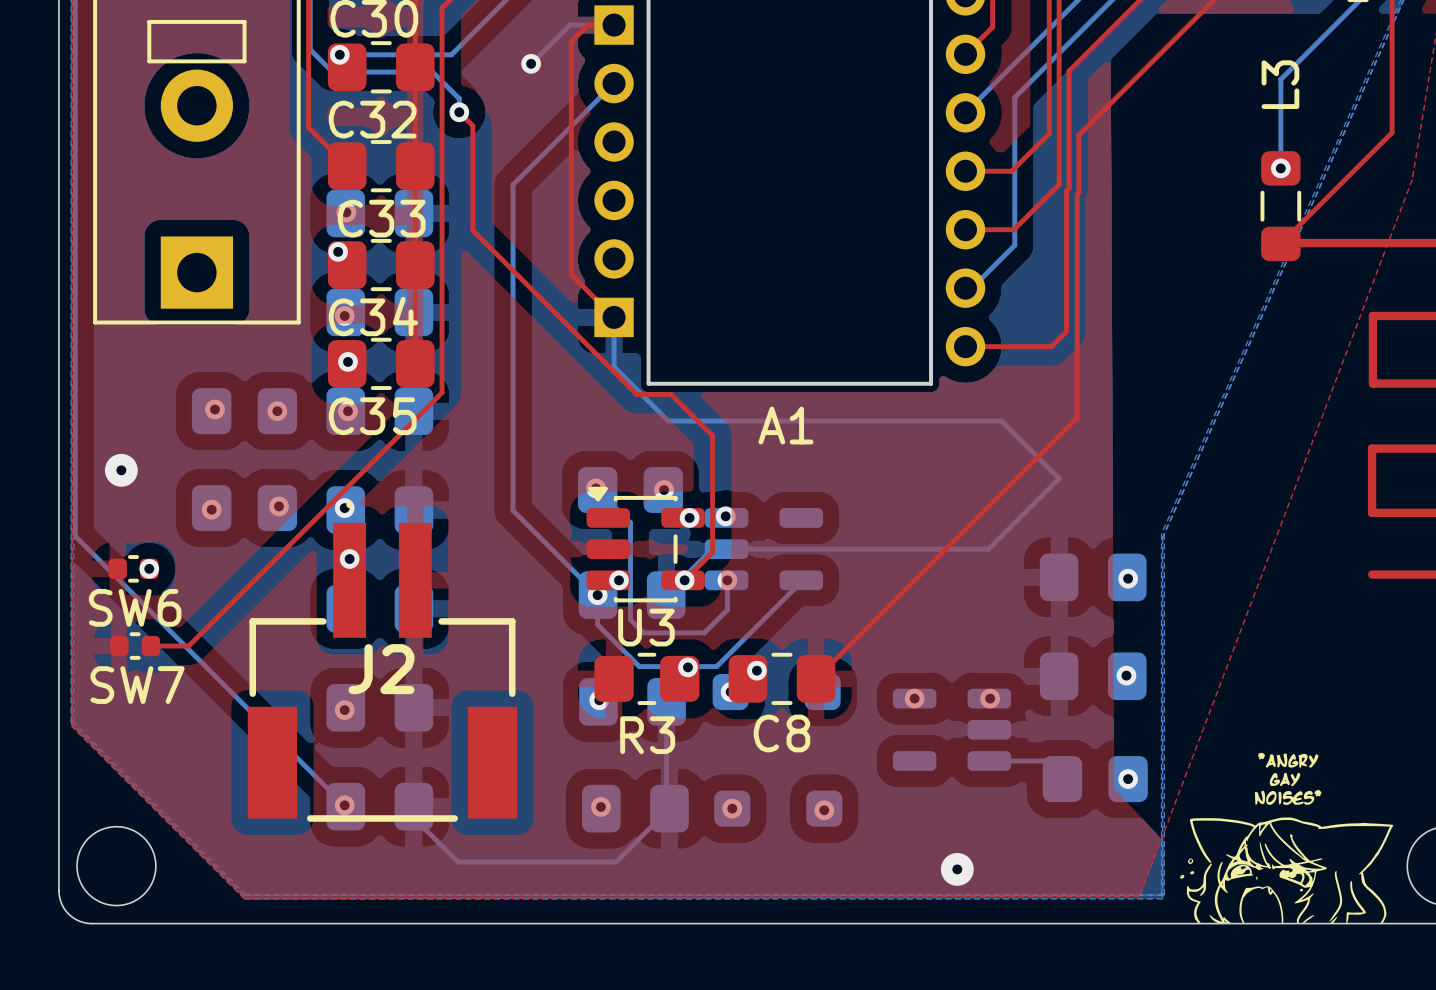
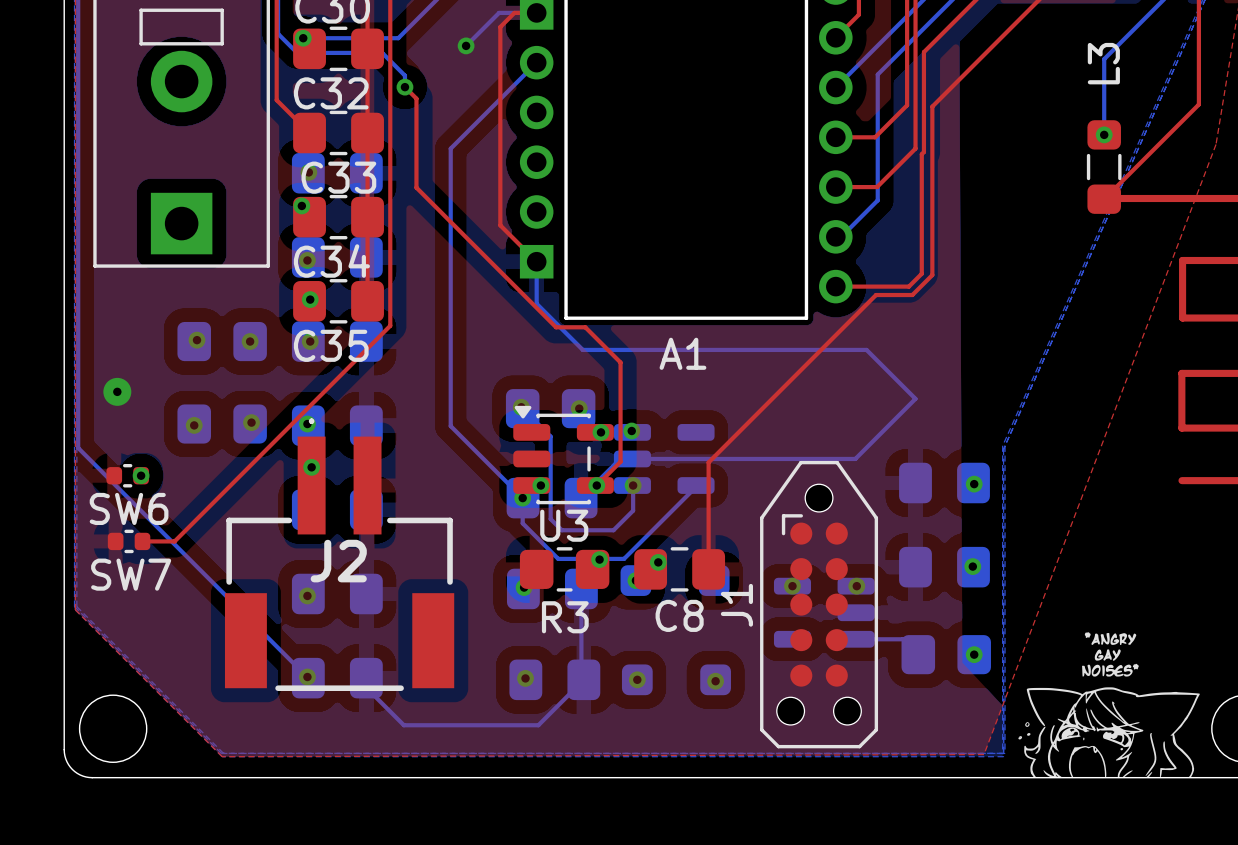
top track: (1078, 192) (1077, 194) (1077, 417) (816, 678) -> (932, 155) (932, 275) (912, 295) (876, 295) (708, 462) (708, 569)
J1: none -> (819, 604)
via: (957, 869) -> none

